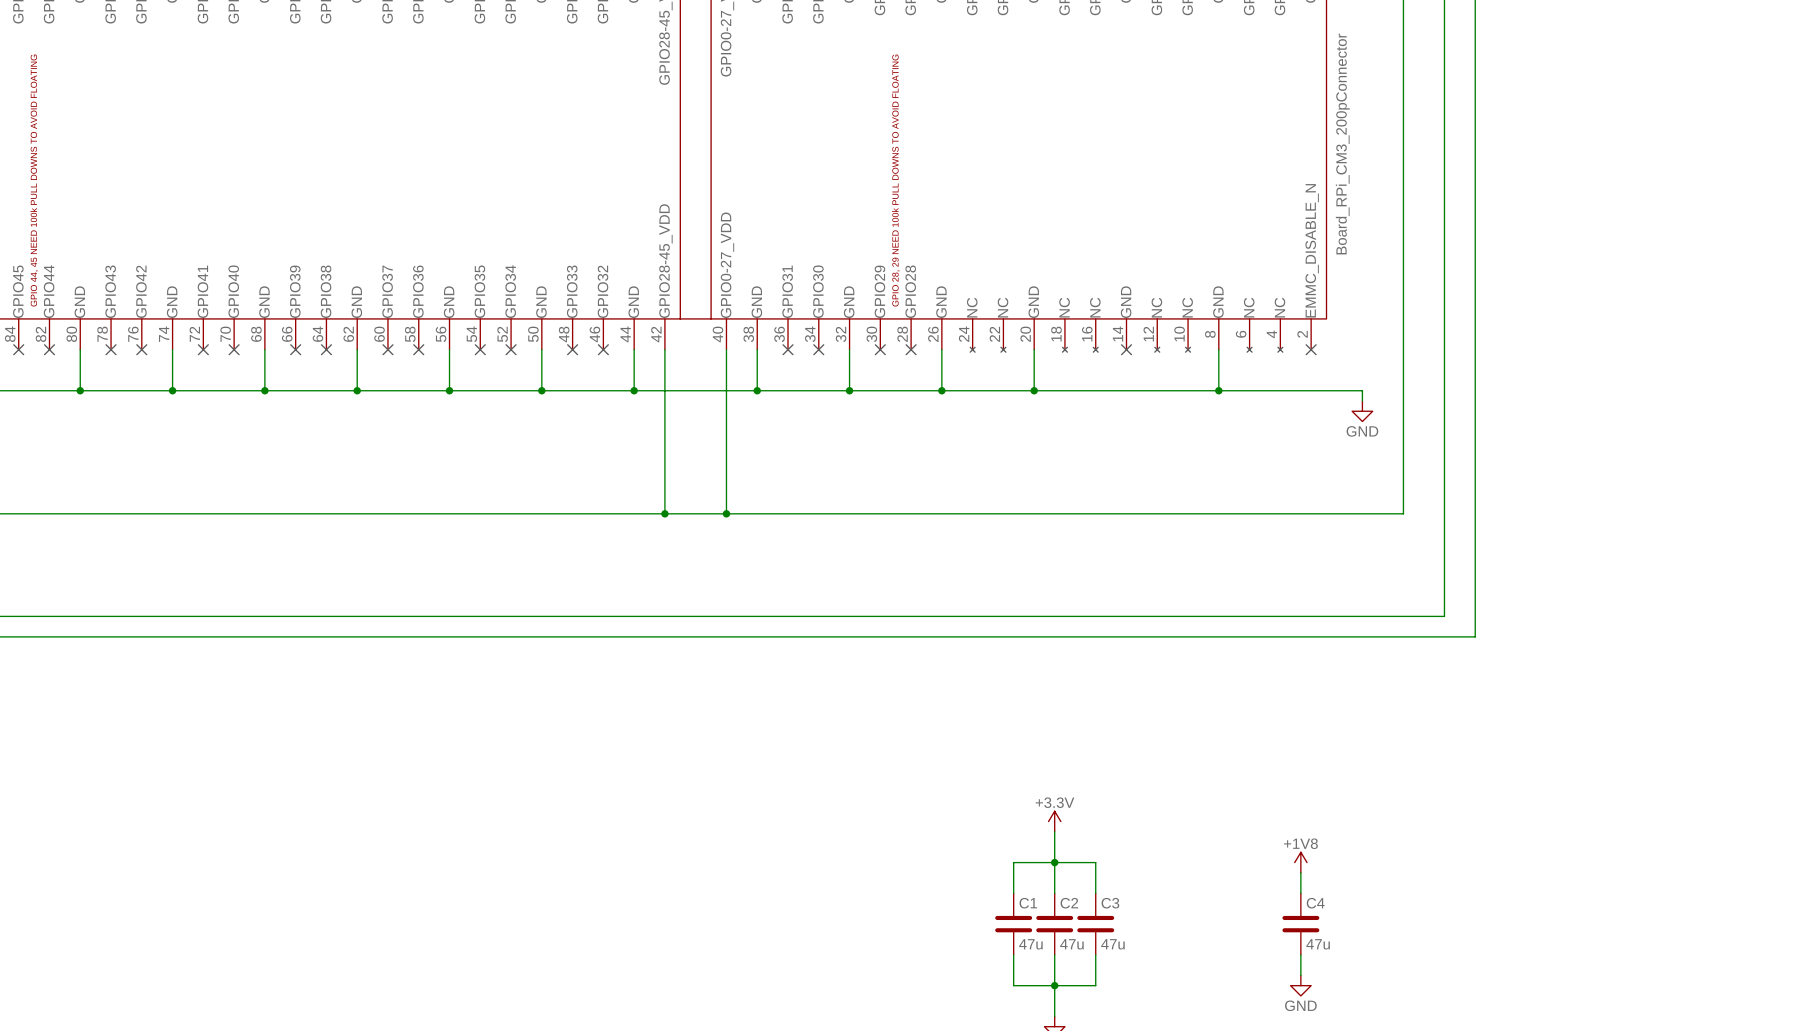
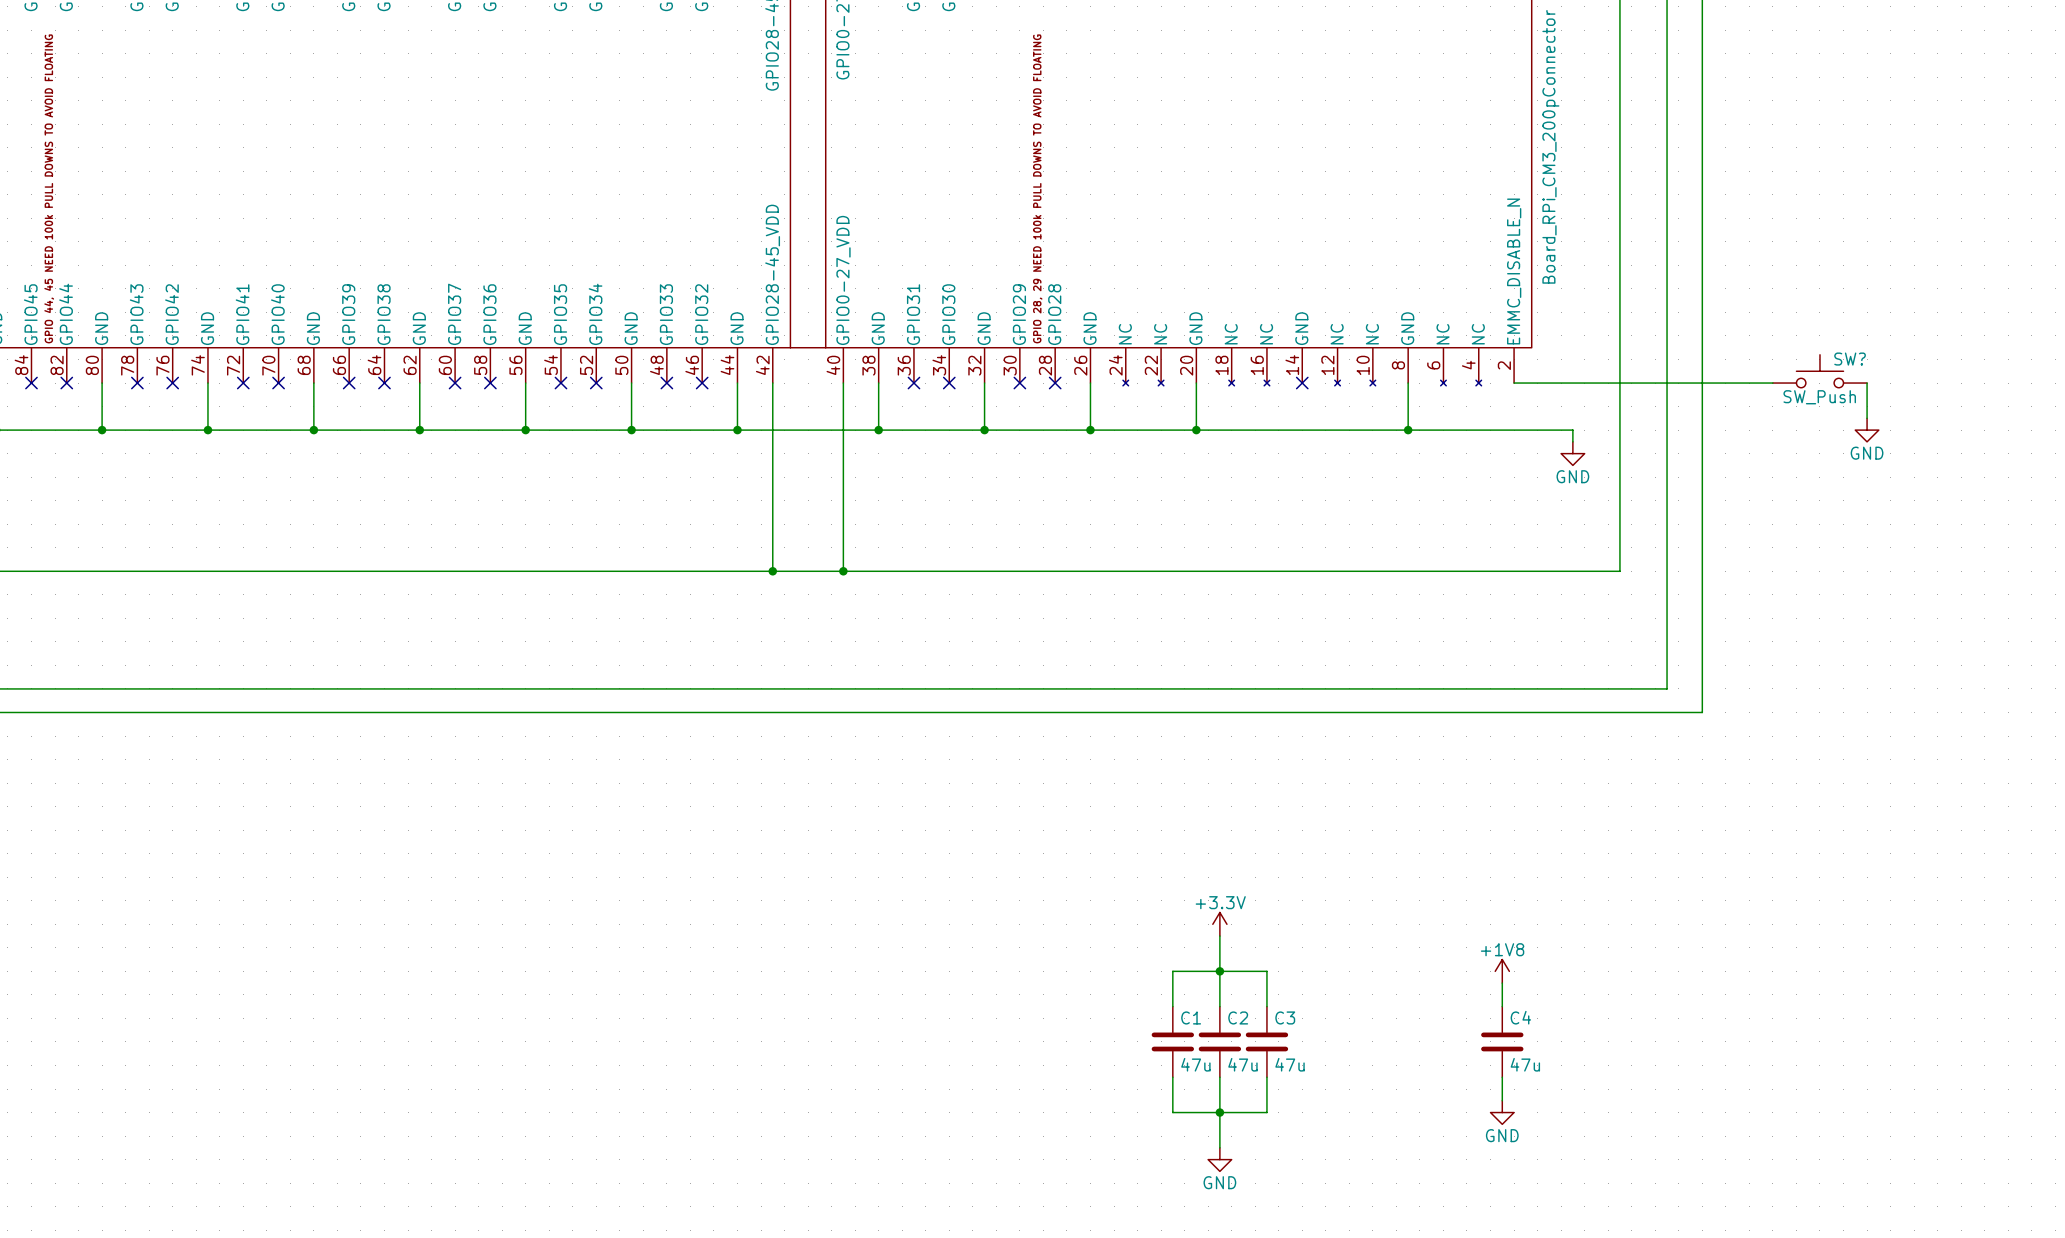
SW?: none -> SW_Push (1819, 371)
wire: none -> (1514, 383) (1772, 383)
no-connect mark: (1311, 349) -> none
wire: none -> (1867, 383) (1867, 418)
power symbol: none -> GND (1867, 430)

